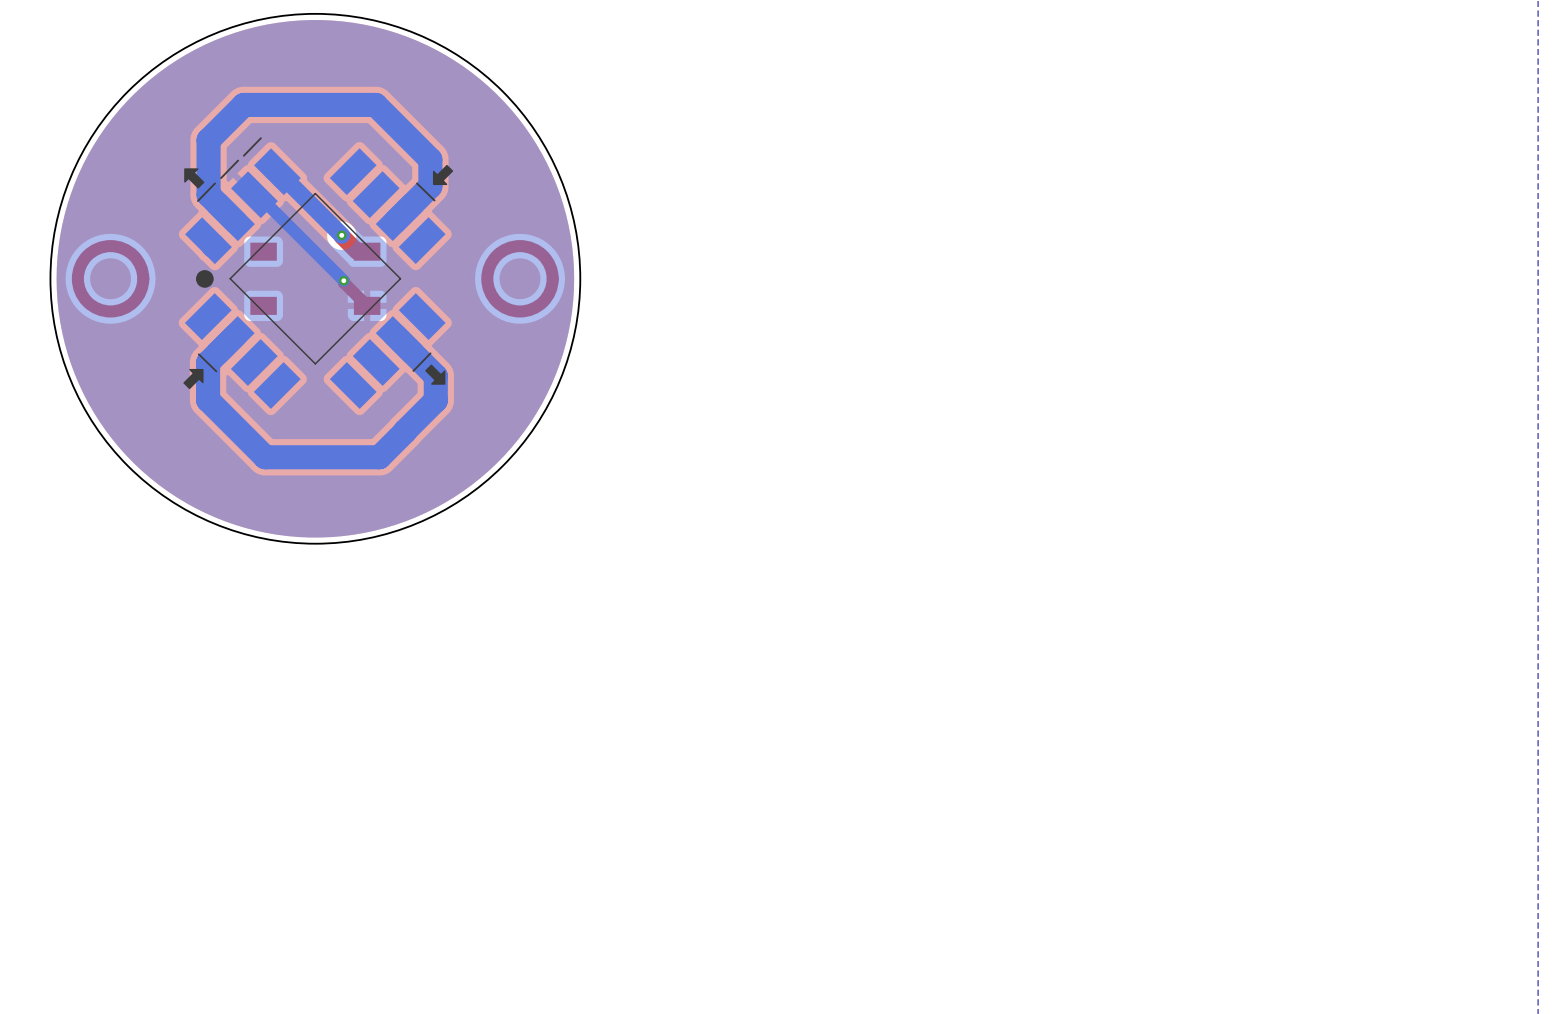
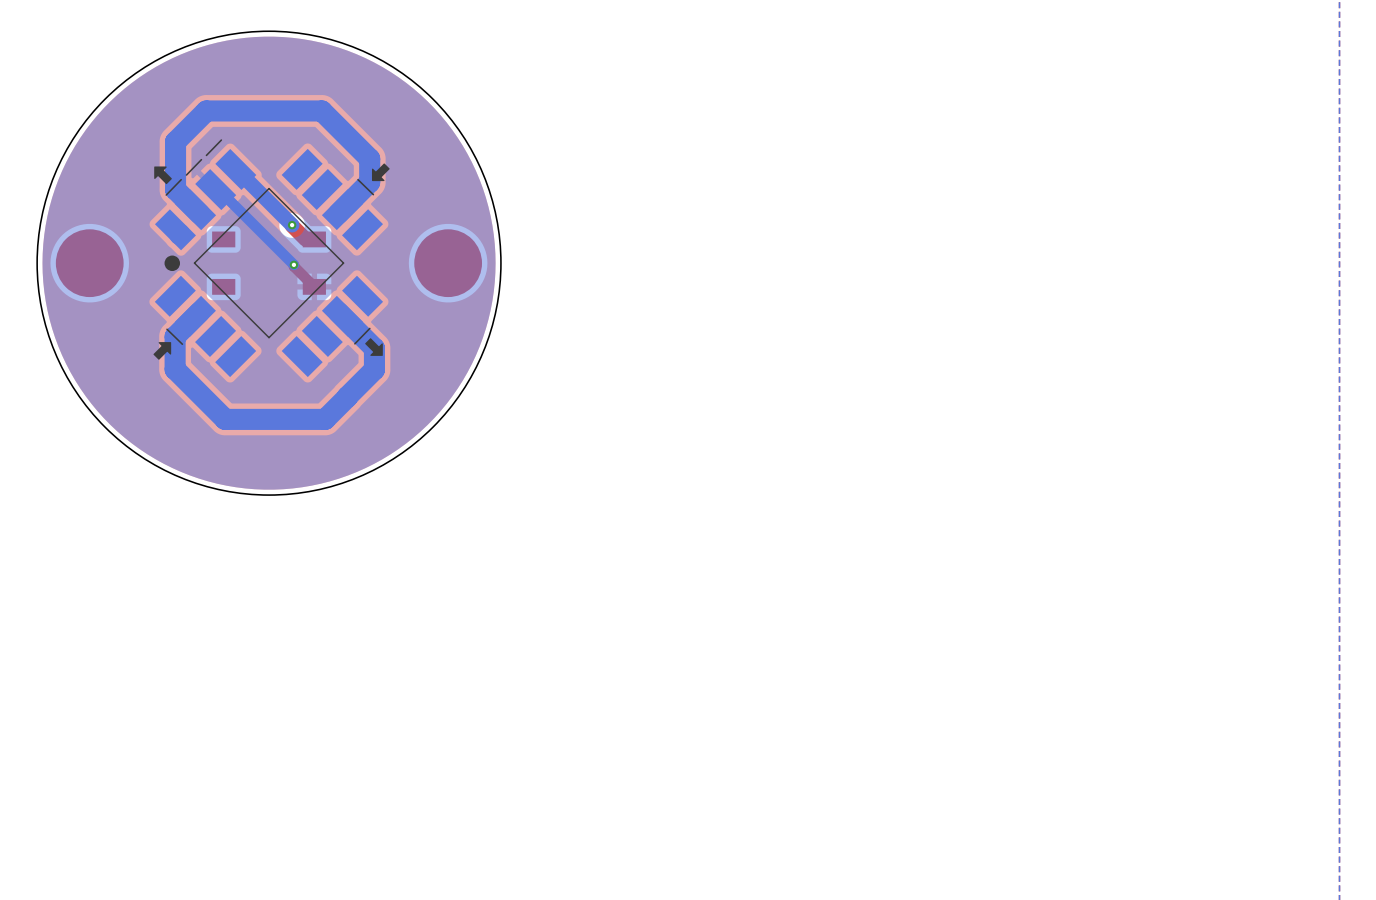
part footprint: [71, 240, 150, 318] -> [55, 229, 124, 298]
part footprint: [481, 240, 559, 318] -> [414, 229, 483, 298]

